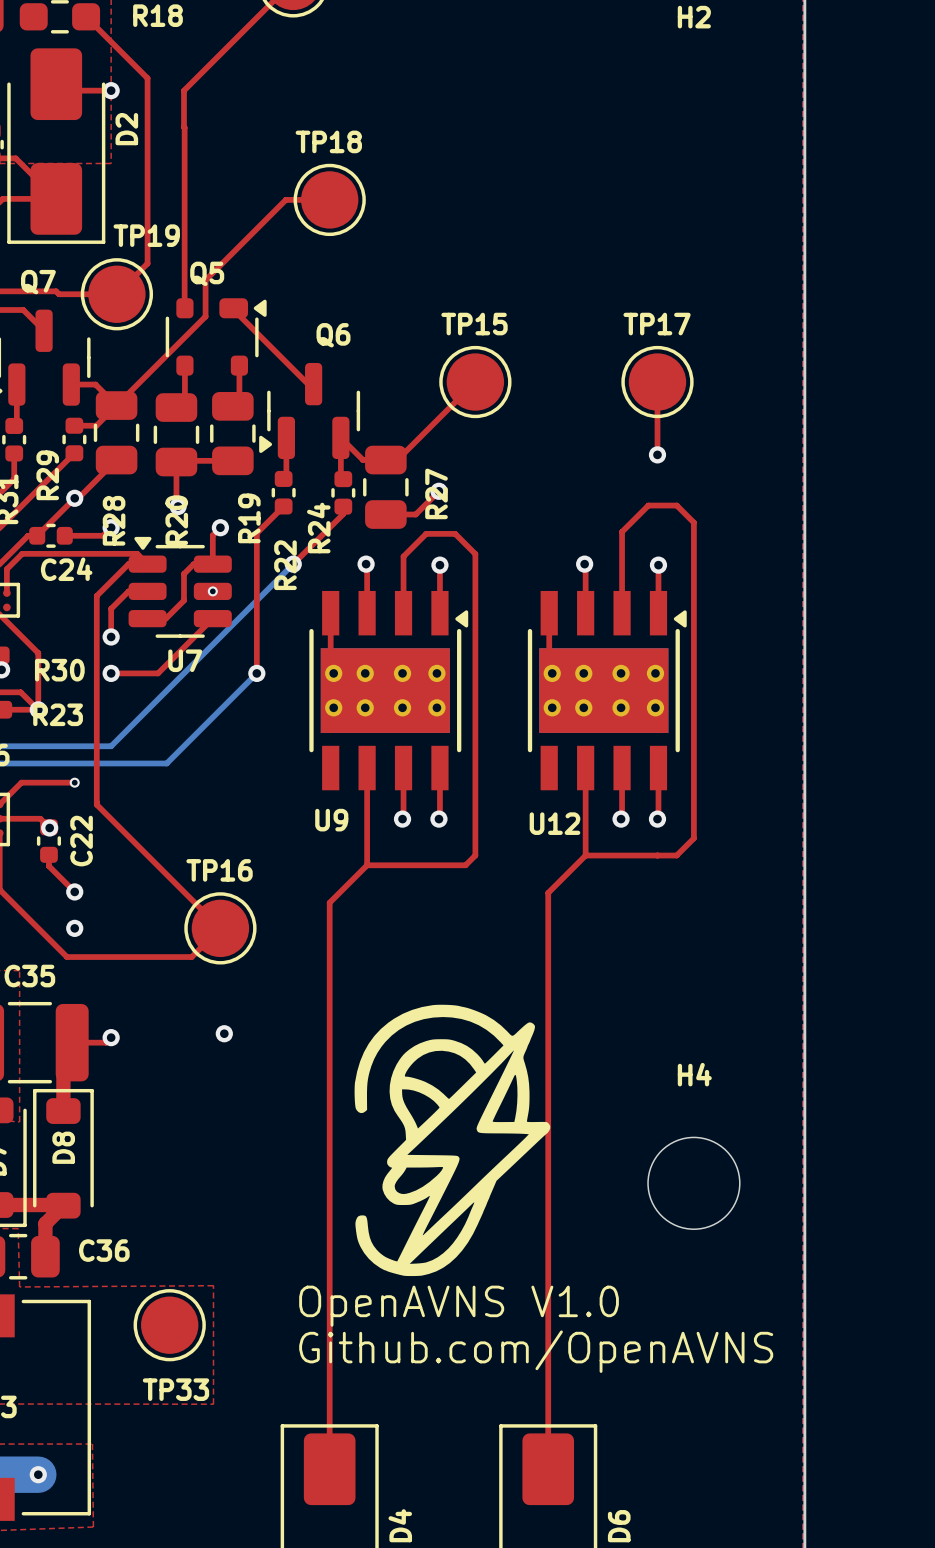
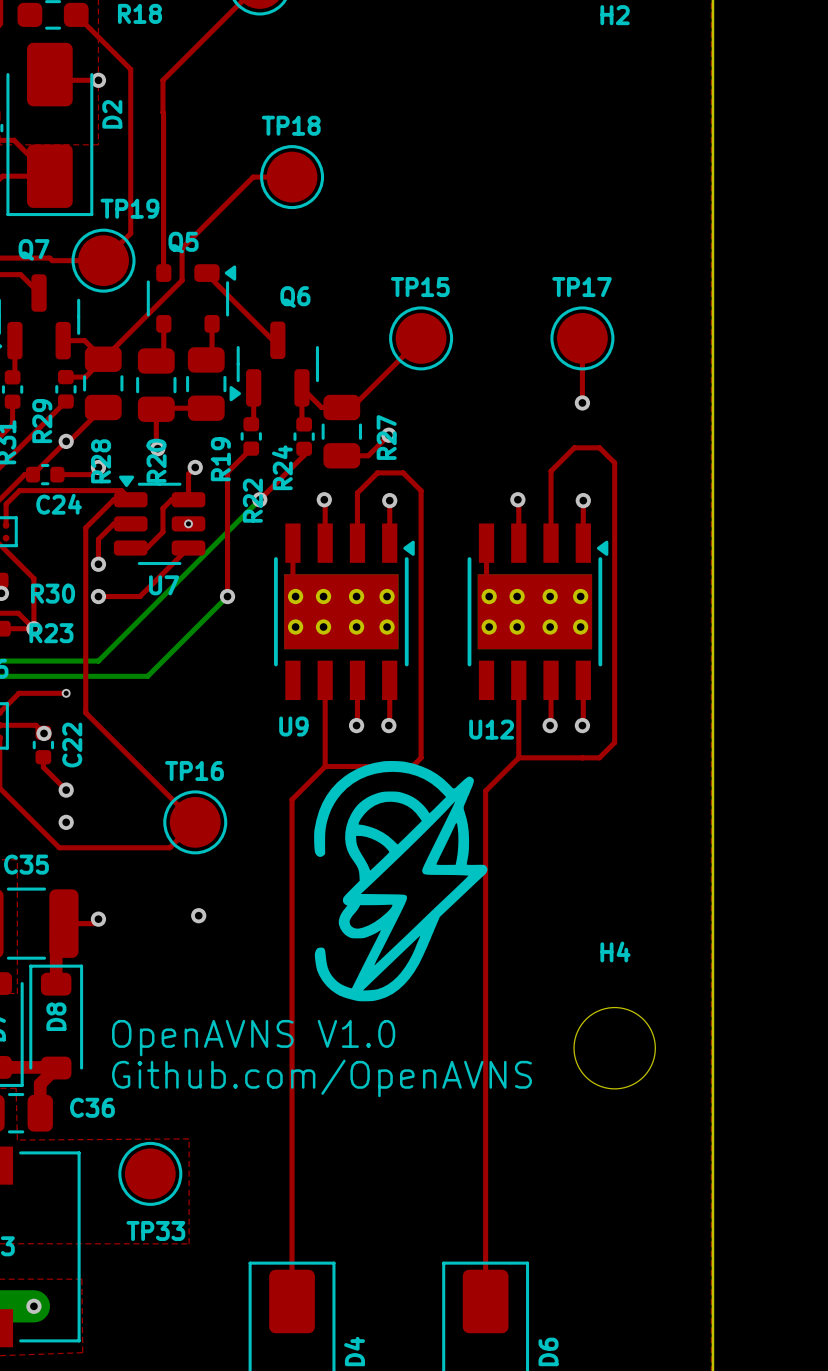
drawing position: (452, 1140) -> (400, 881)
text position: OpenAVNS V1.0 (459, 1306) -> OpenAVNS V1.0 (253, 1038)
text position: Github.com/OpenAVNS (536, 1351) -> Github.com/OpenAVNS (321, 1078)

